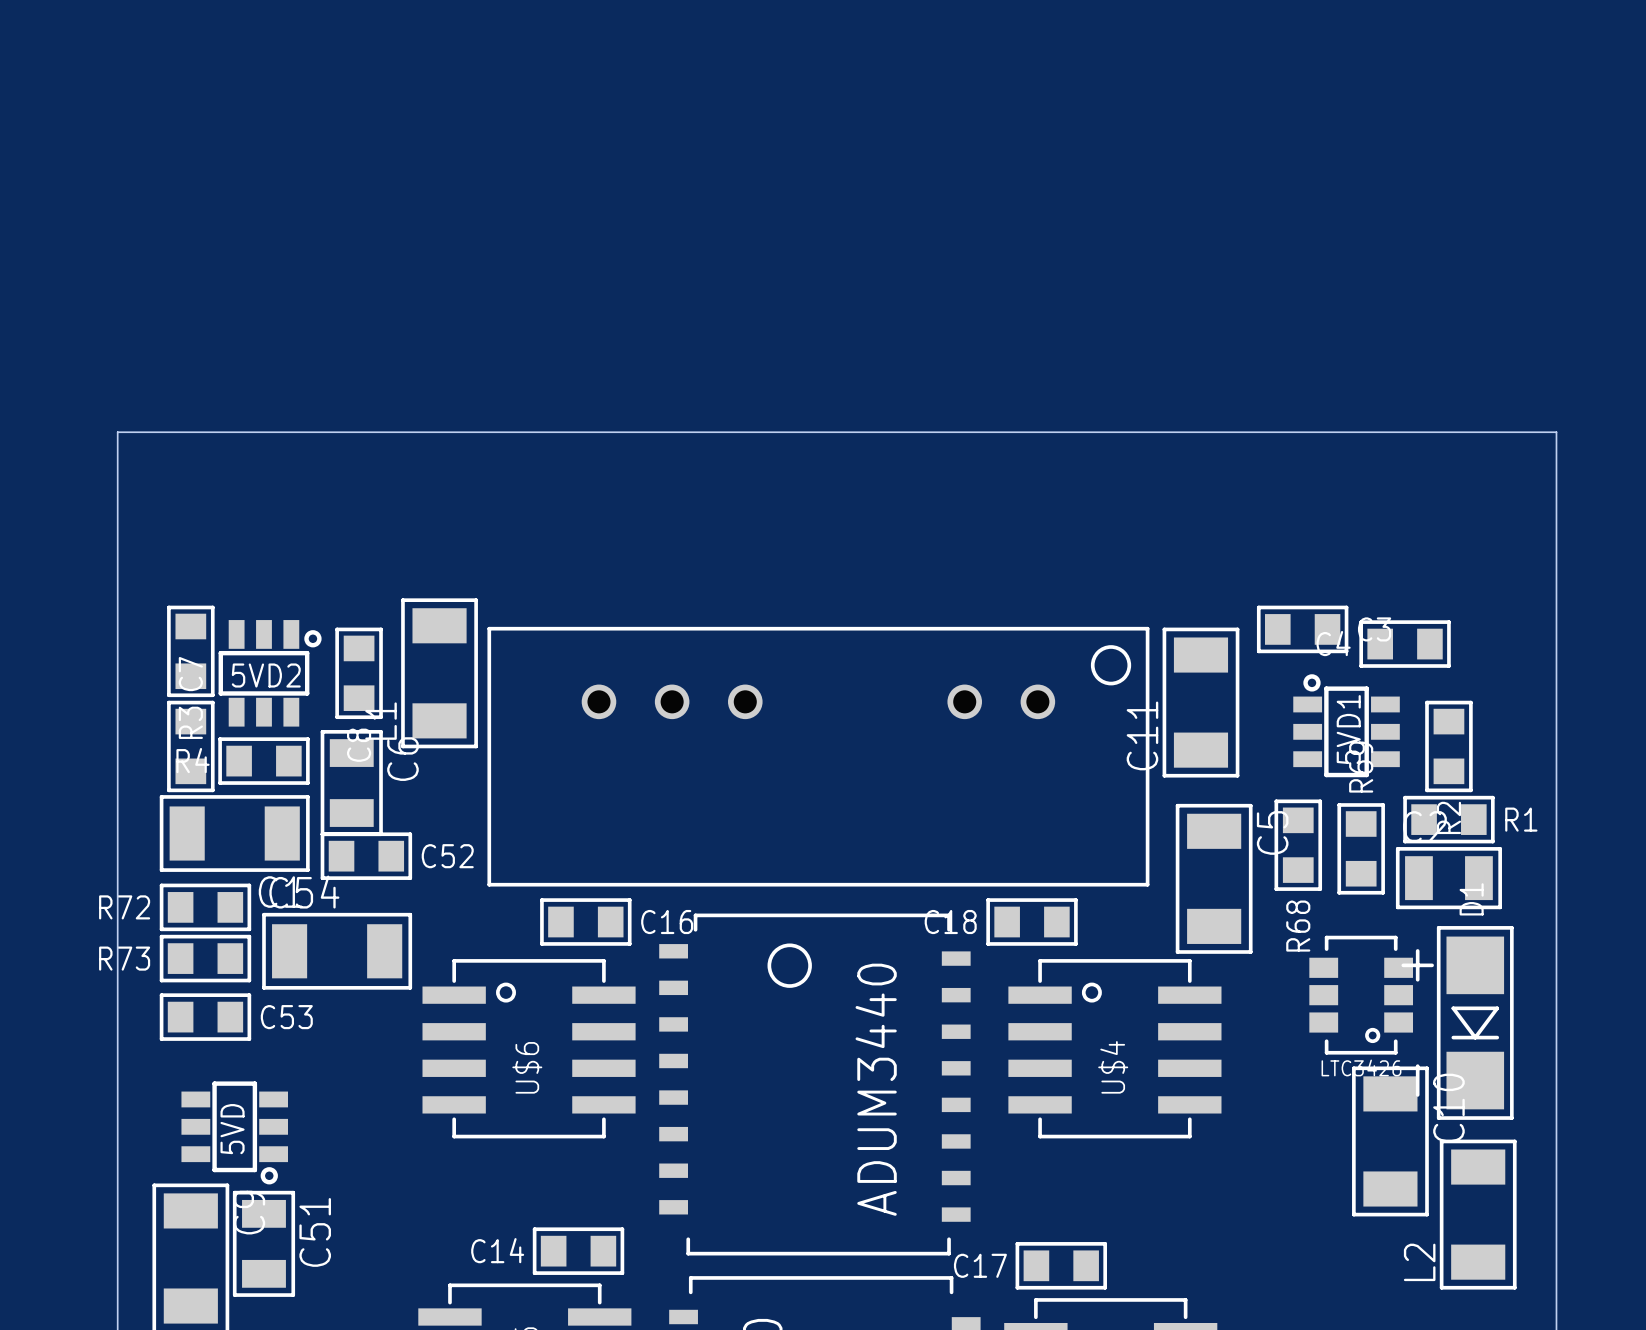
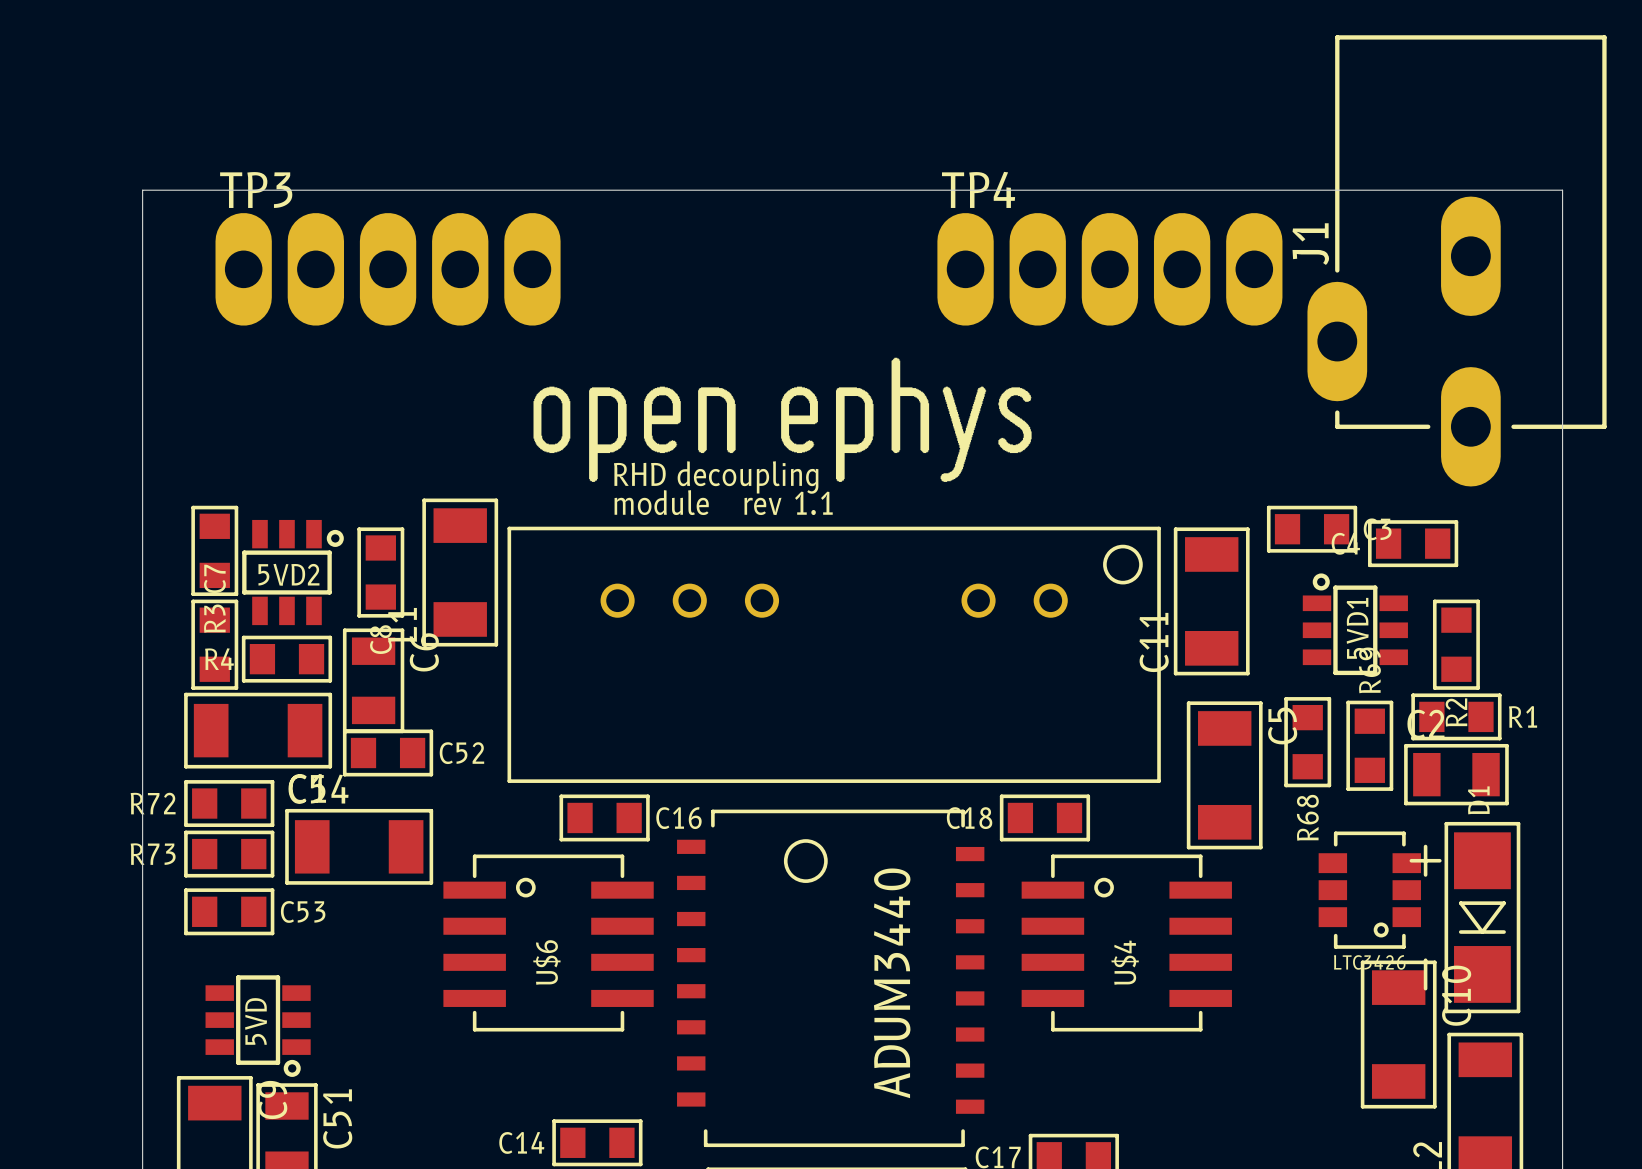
J1: none -> (1457, 260)
TP3: none -> (388, 269)
TP4: none -> (1109, 269)
board edge: (117, 432) (1556, 432) -> (142, 334) (142, 190) (1562, 190) (1562, 334)
drawing: none -> [533, 357, 1032, 482]
text: none -> RHD decoupling (716, 477)
text: none -> module (661, 502)
text: none -> rev 1.1 (788, 503)

